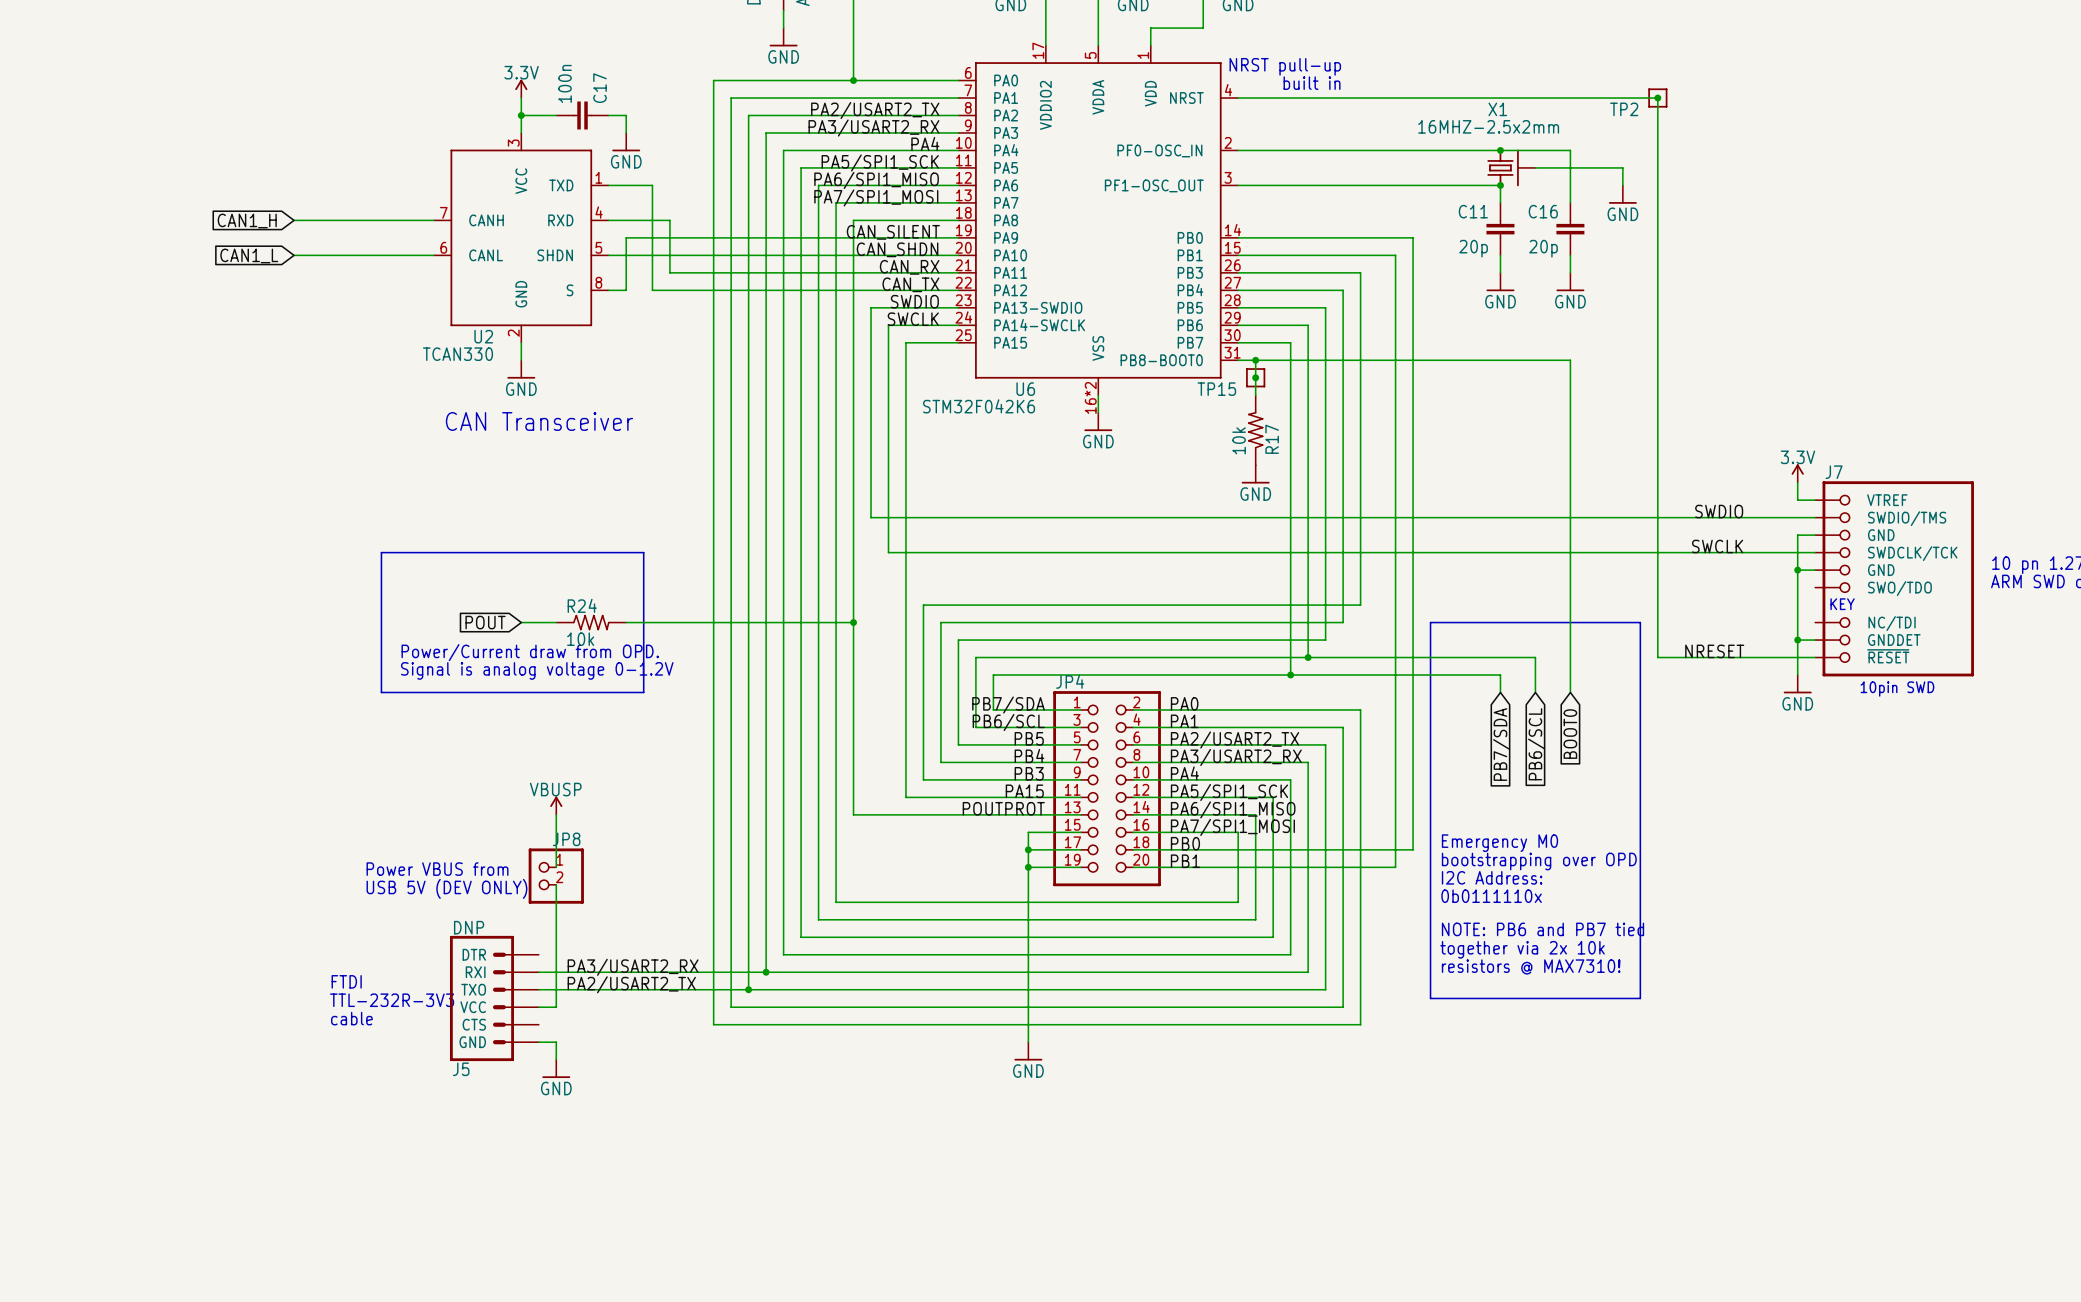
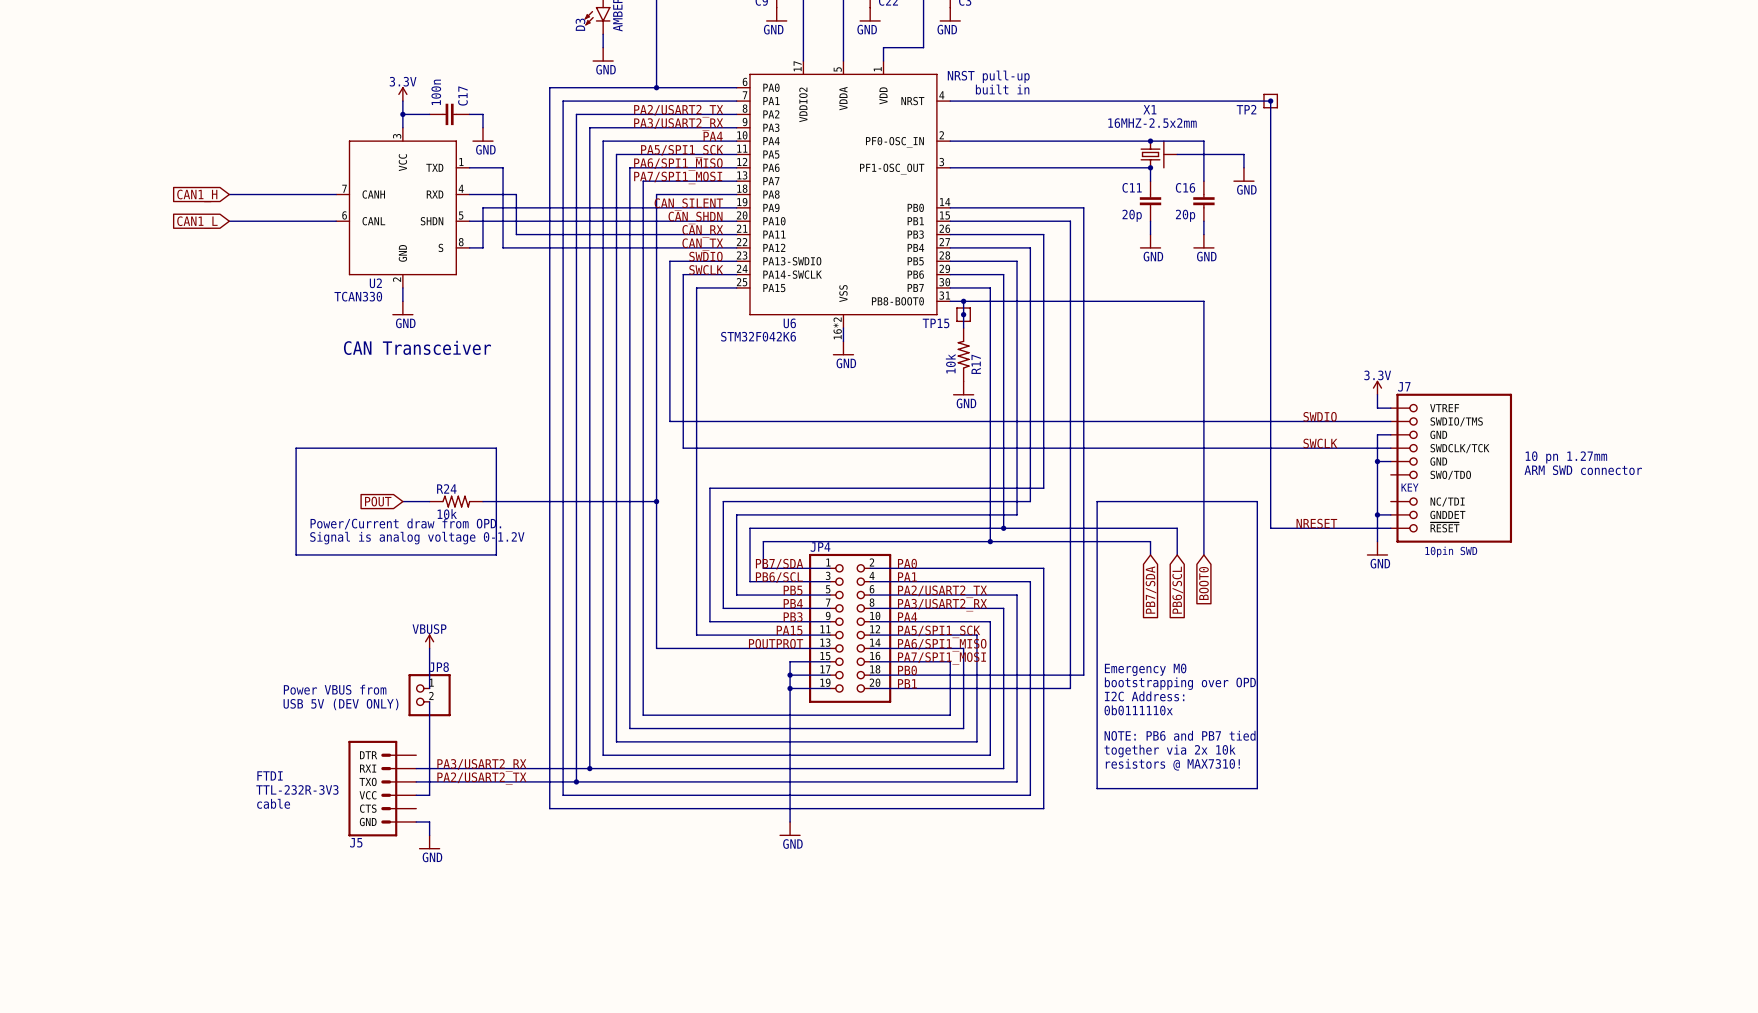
J5 value: DNP (469, 927) -> none

